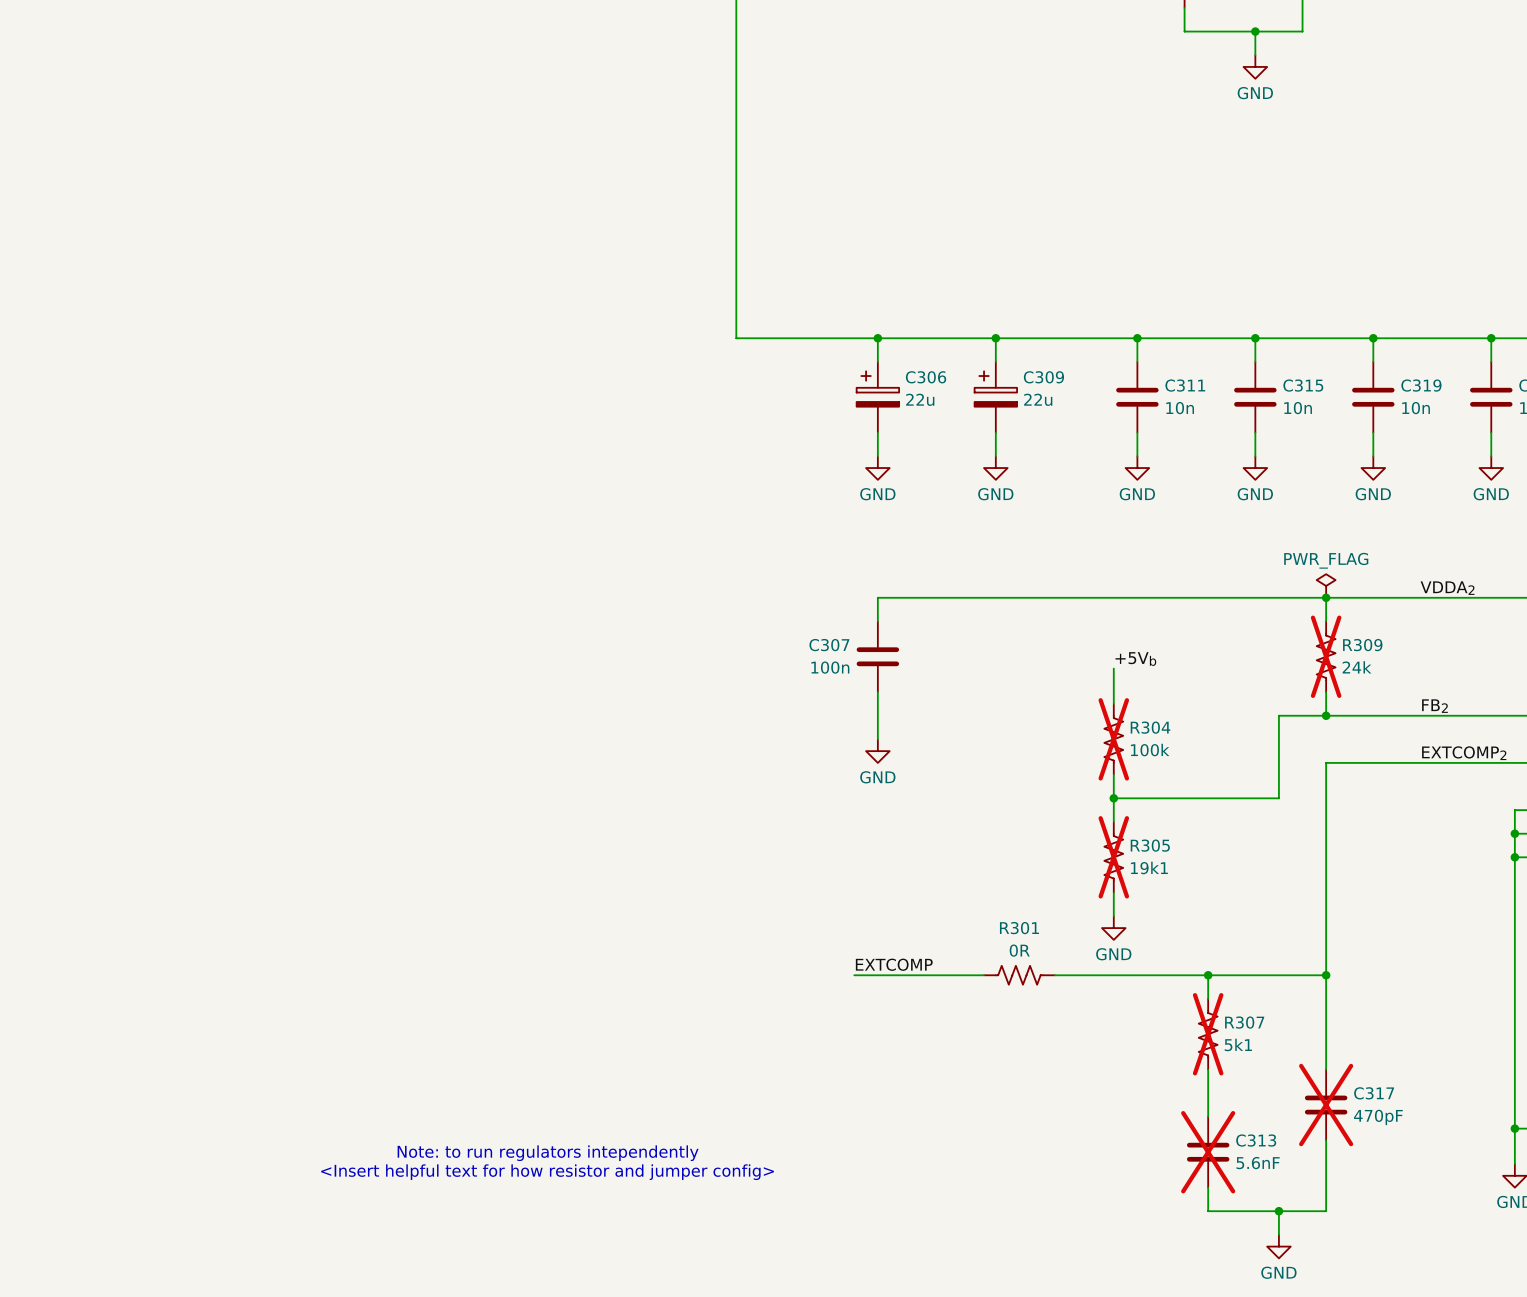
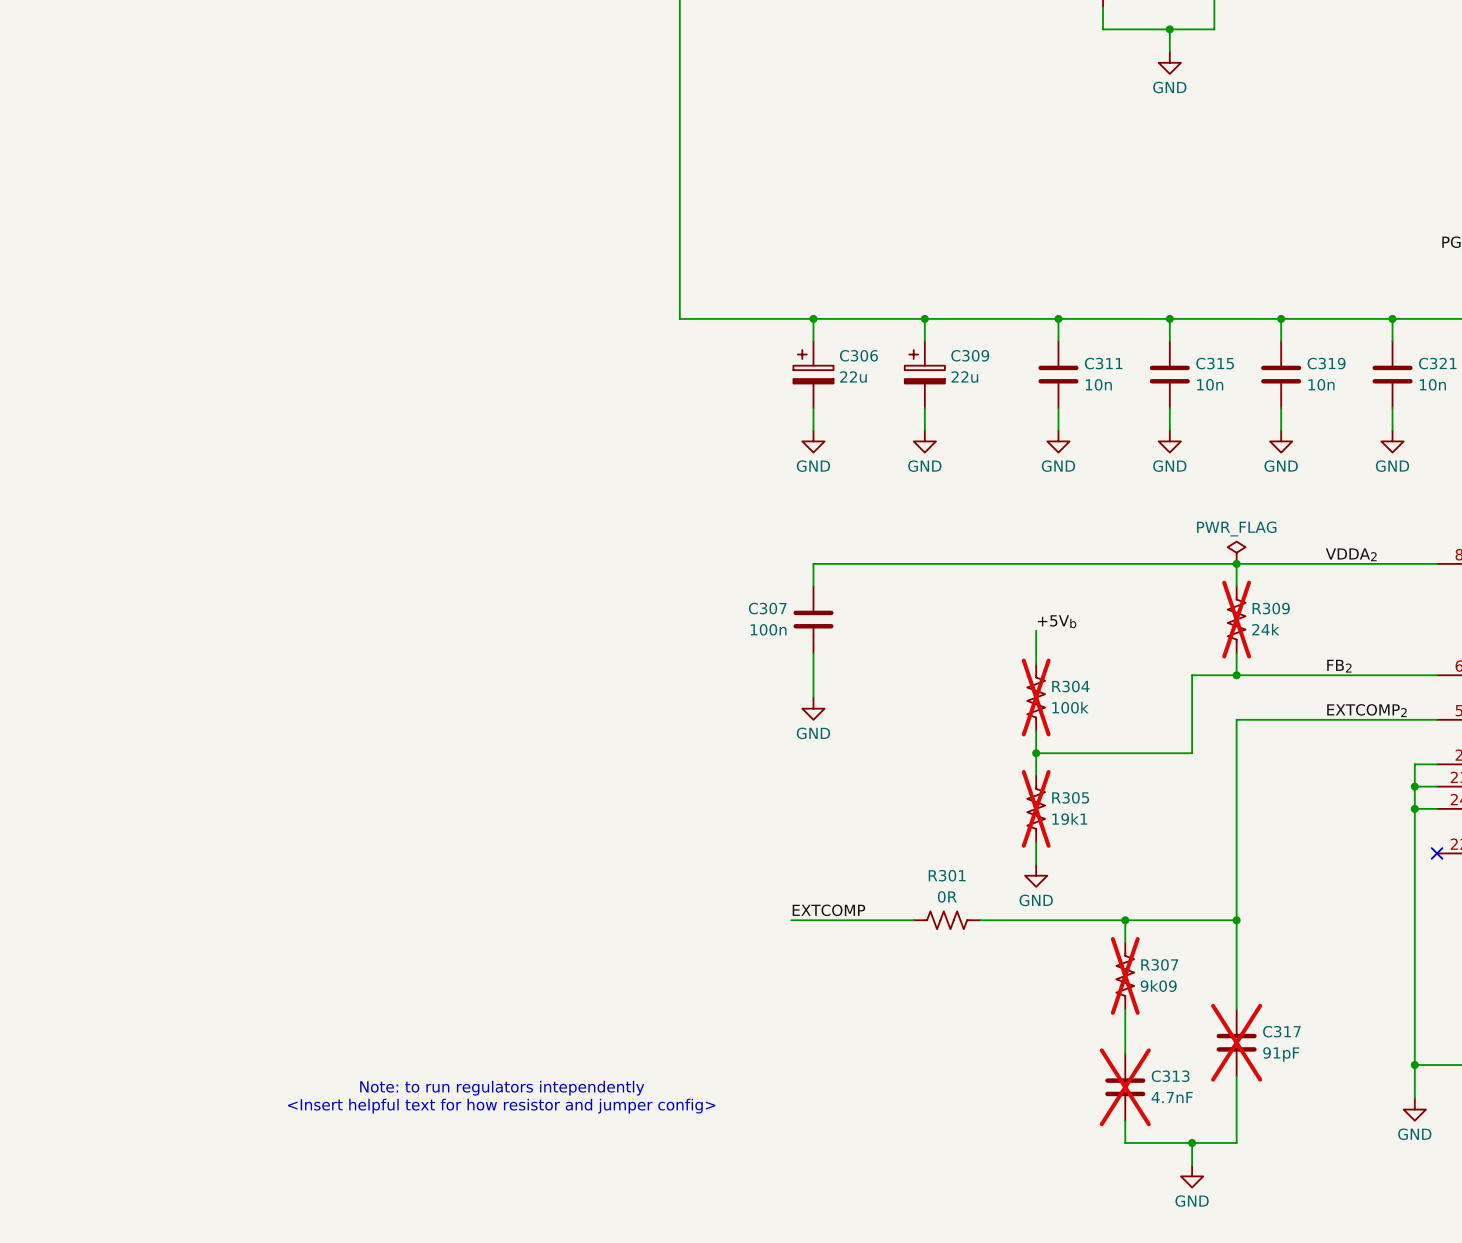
R307 value: 5k1 (1238, 1044) -> 9k09 (1158, 986)
C317 value: 470pF (1378, 1117) -> 91pF (1281, 1054)
C313 value: 5.6nF (1258, 1163) -> 4.7nF (1172, 1097)

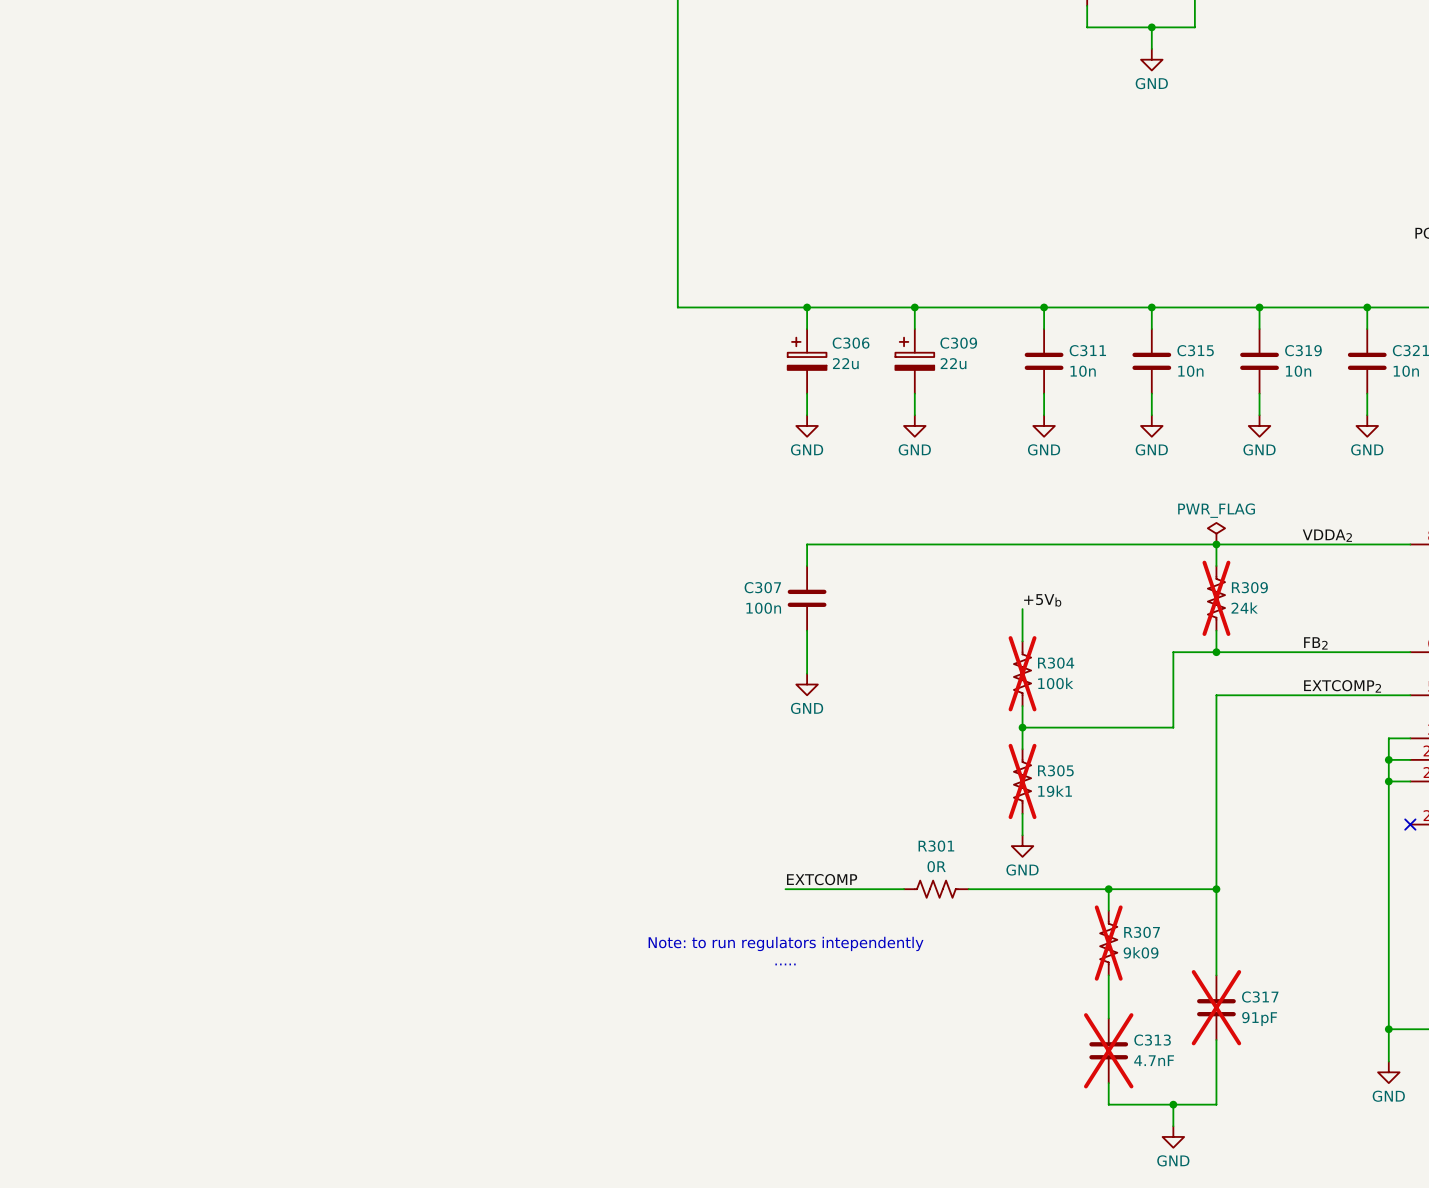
text: none -> Note: to run regulators intependently (786, 943)
text: none -> ..... (785, 964)
text: Note: to run regulators intependently (502, 1088) -> none
text: <Insert helpful text for how resistor and jumper config> (501, 1106) -> none

